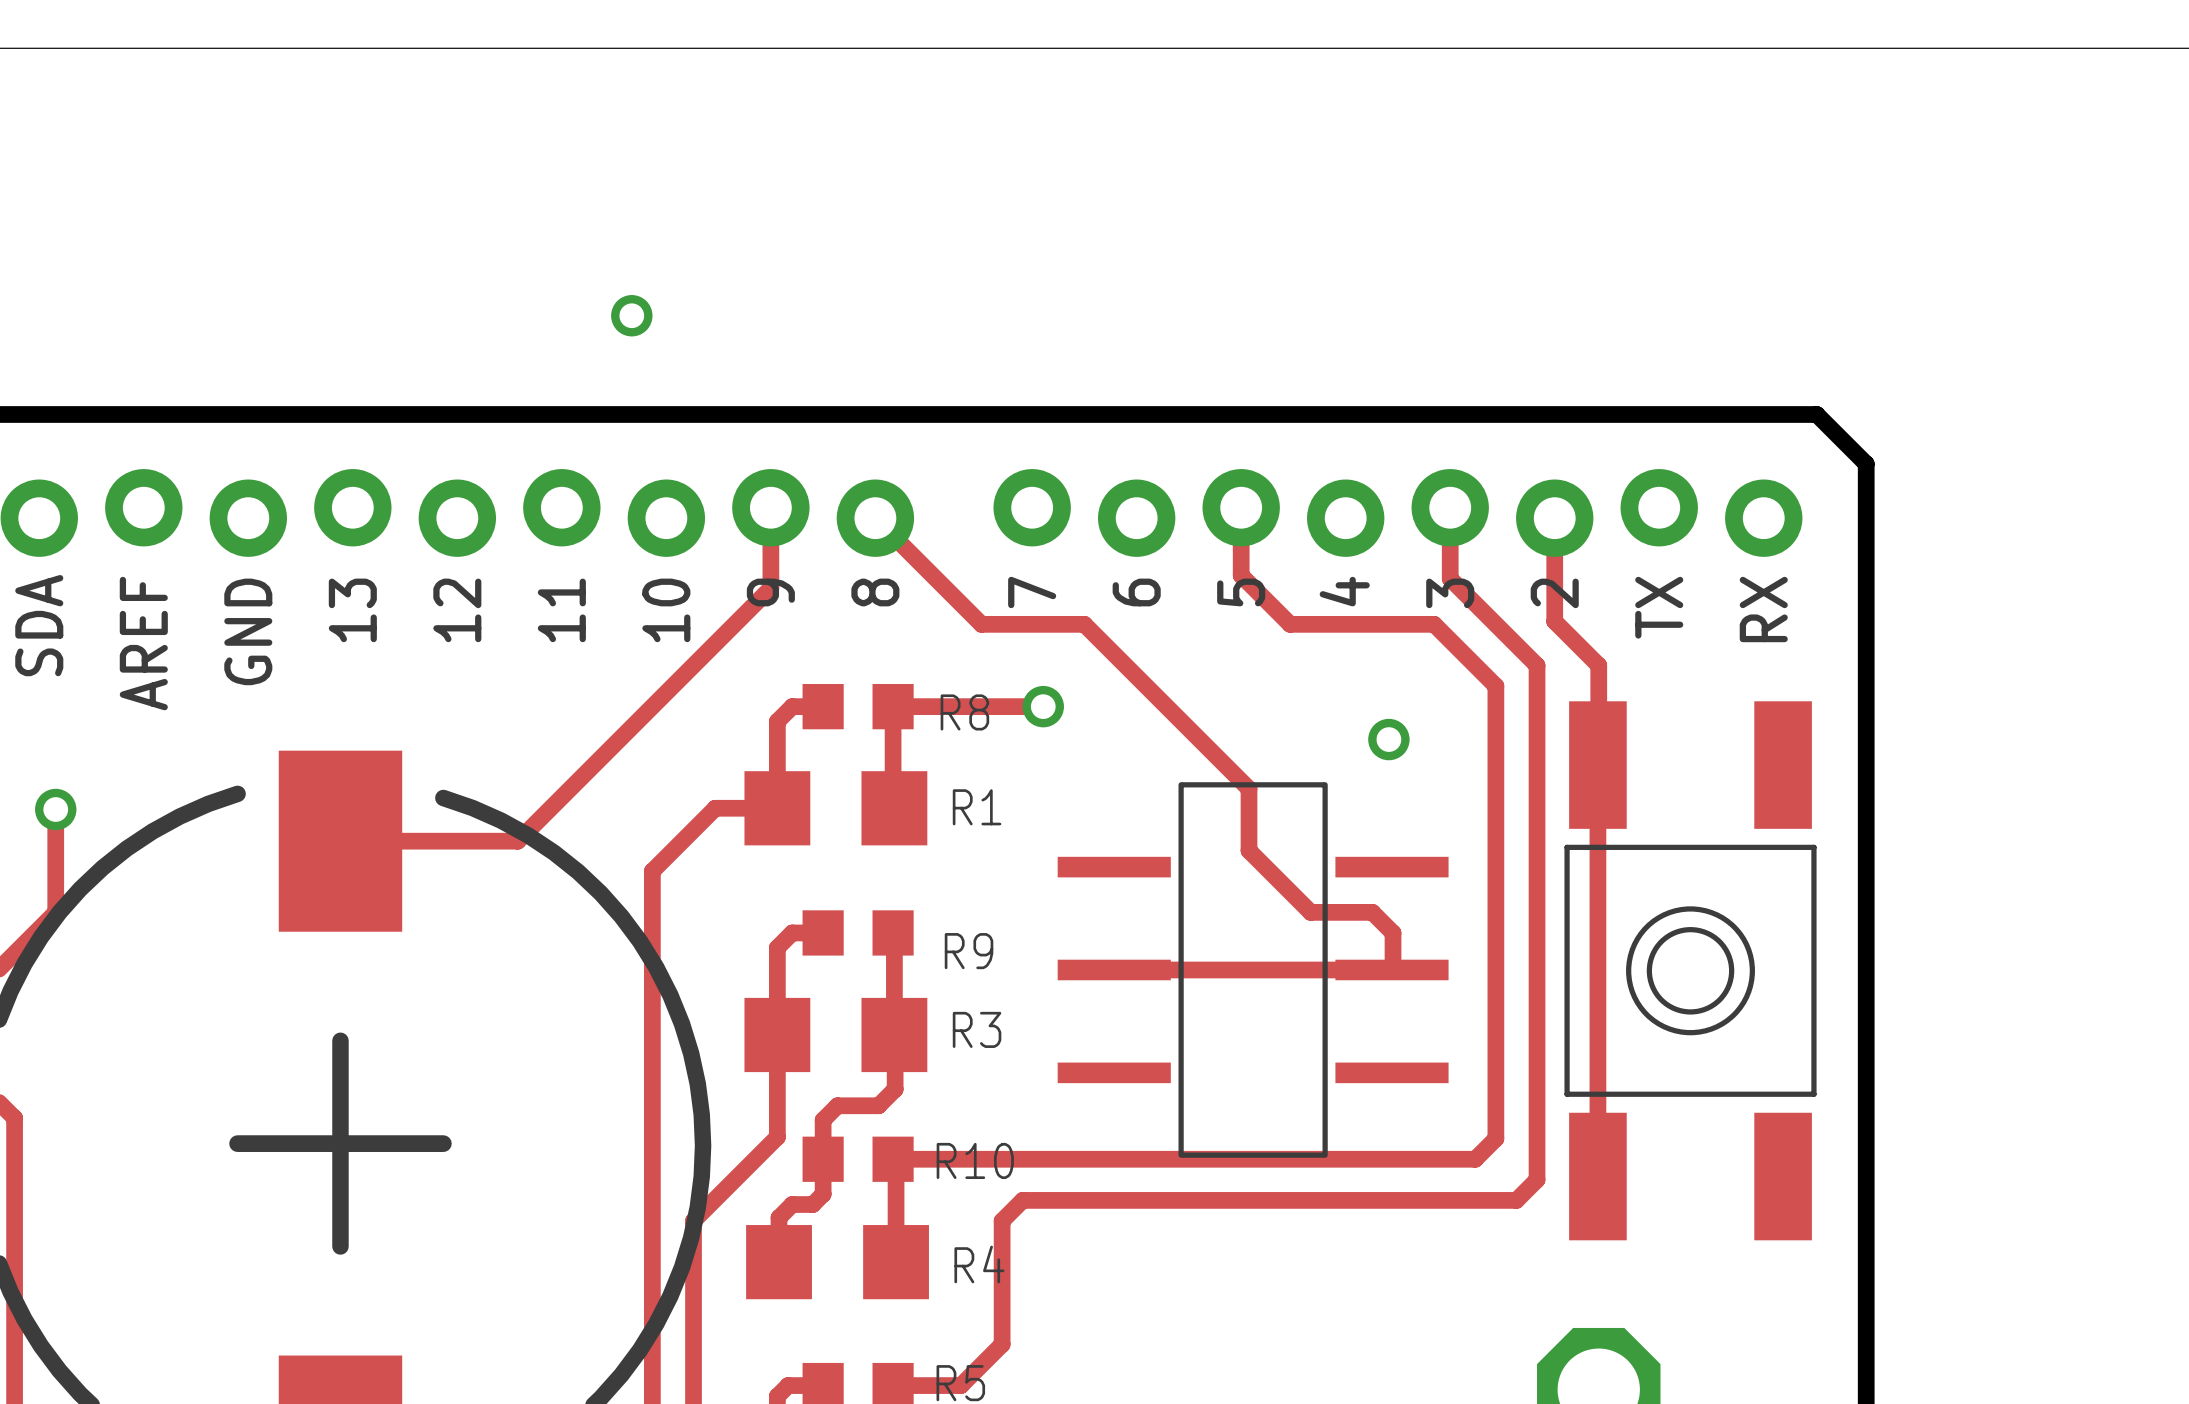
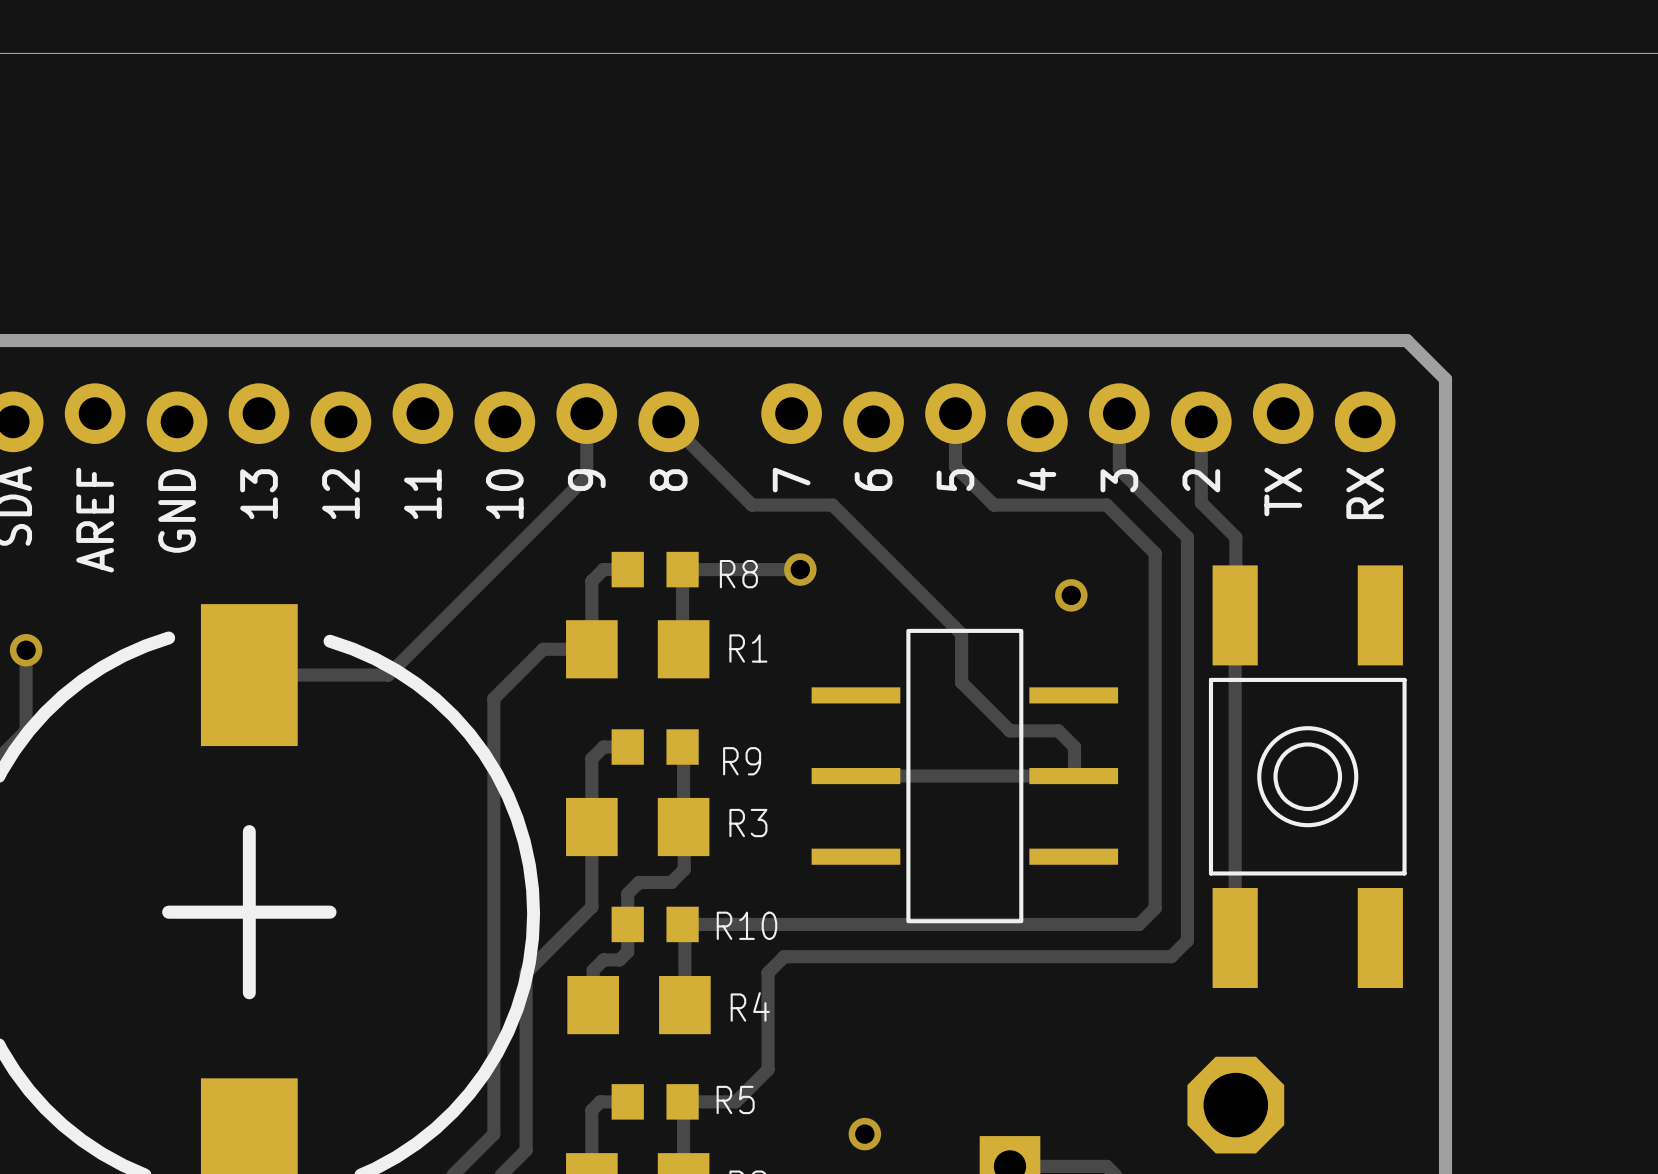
via: (631, 315) -> none

